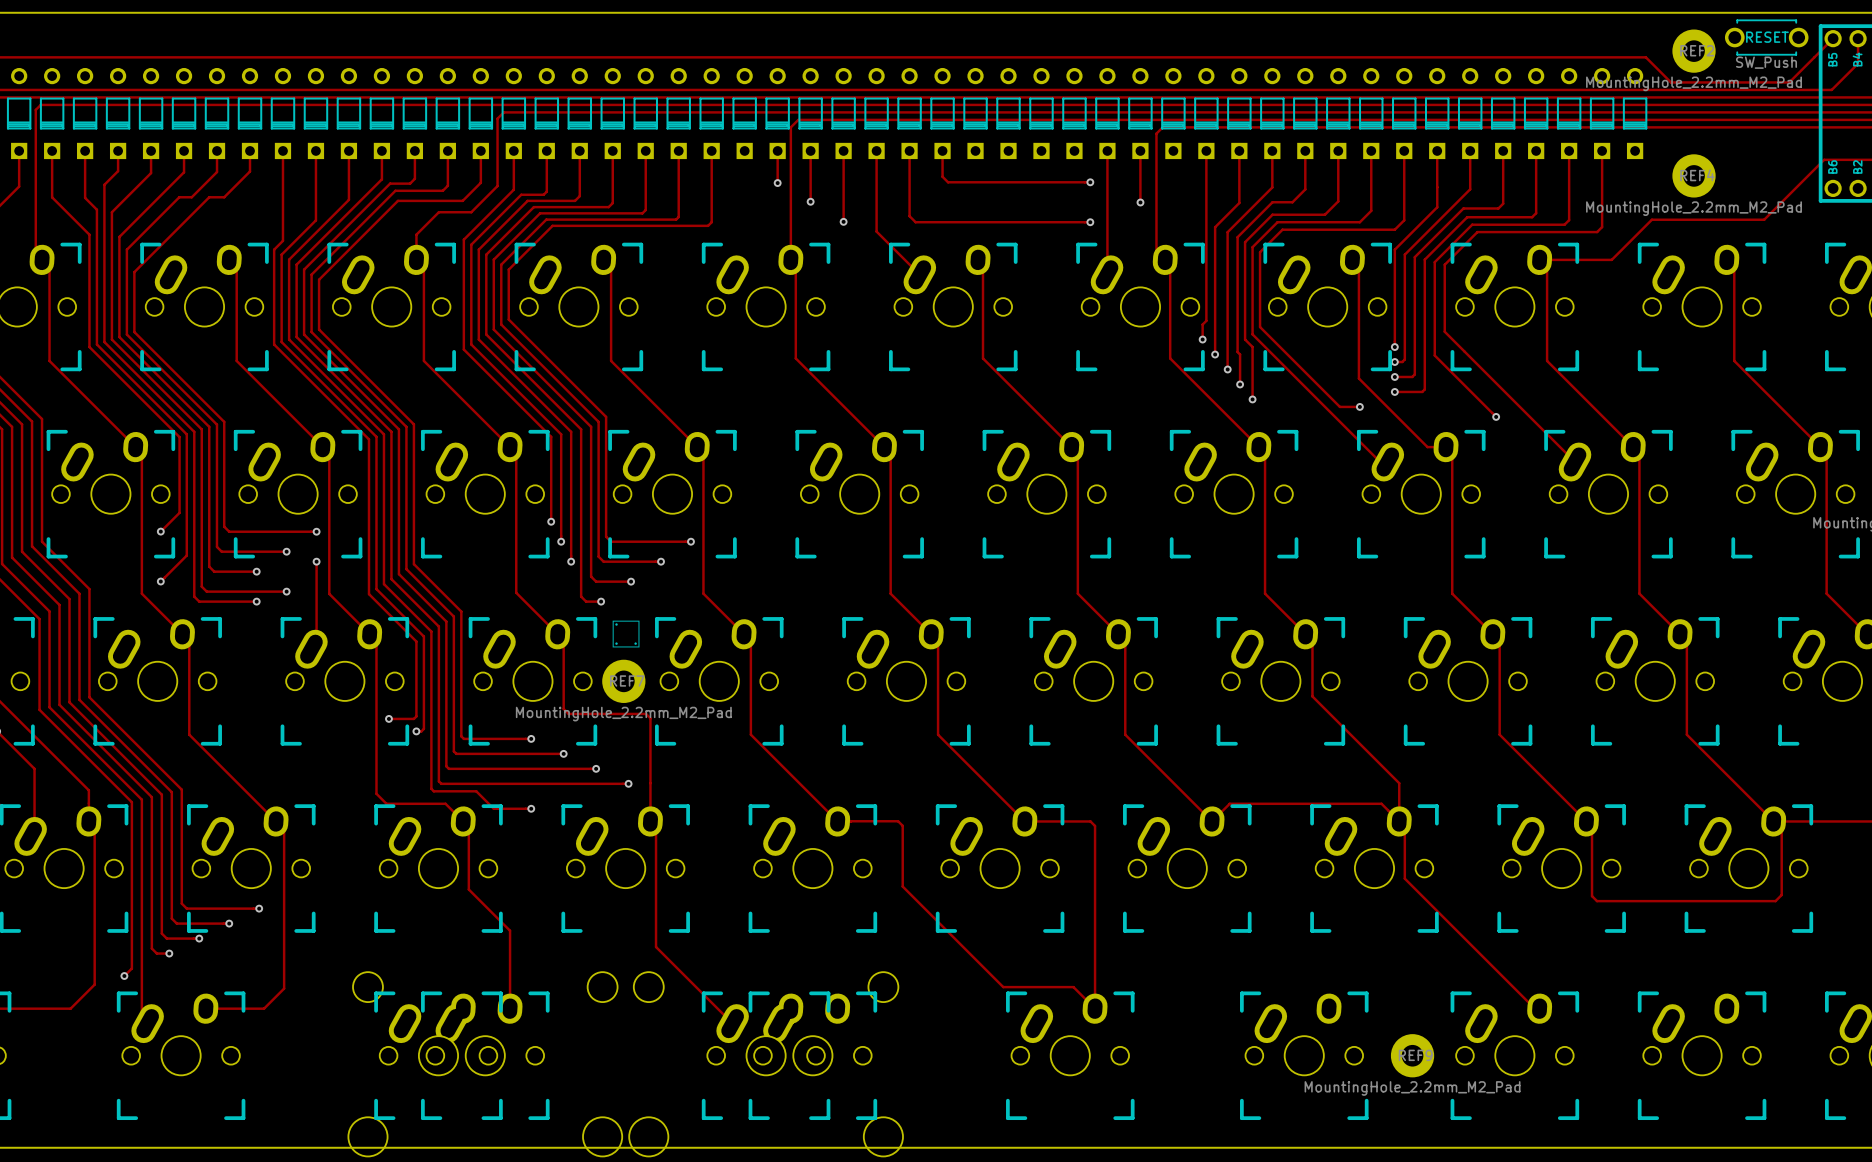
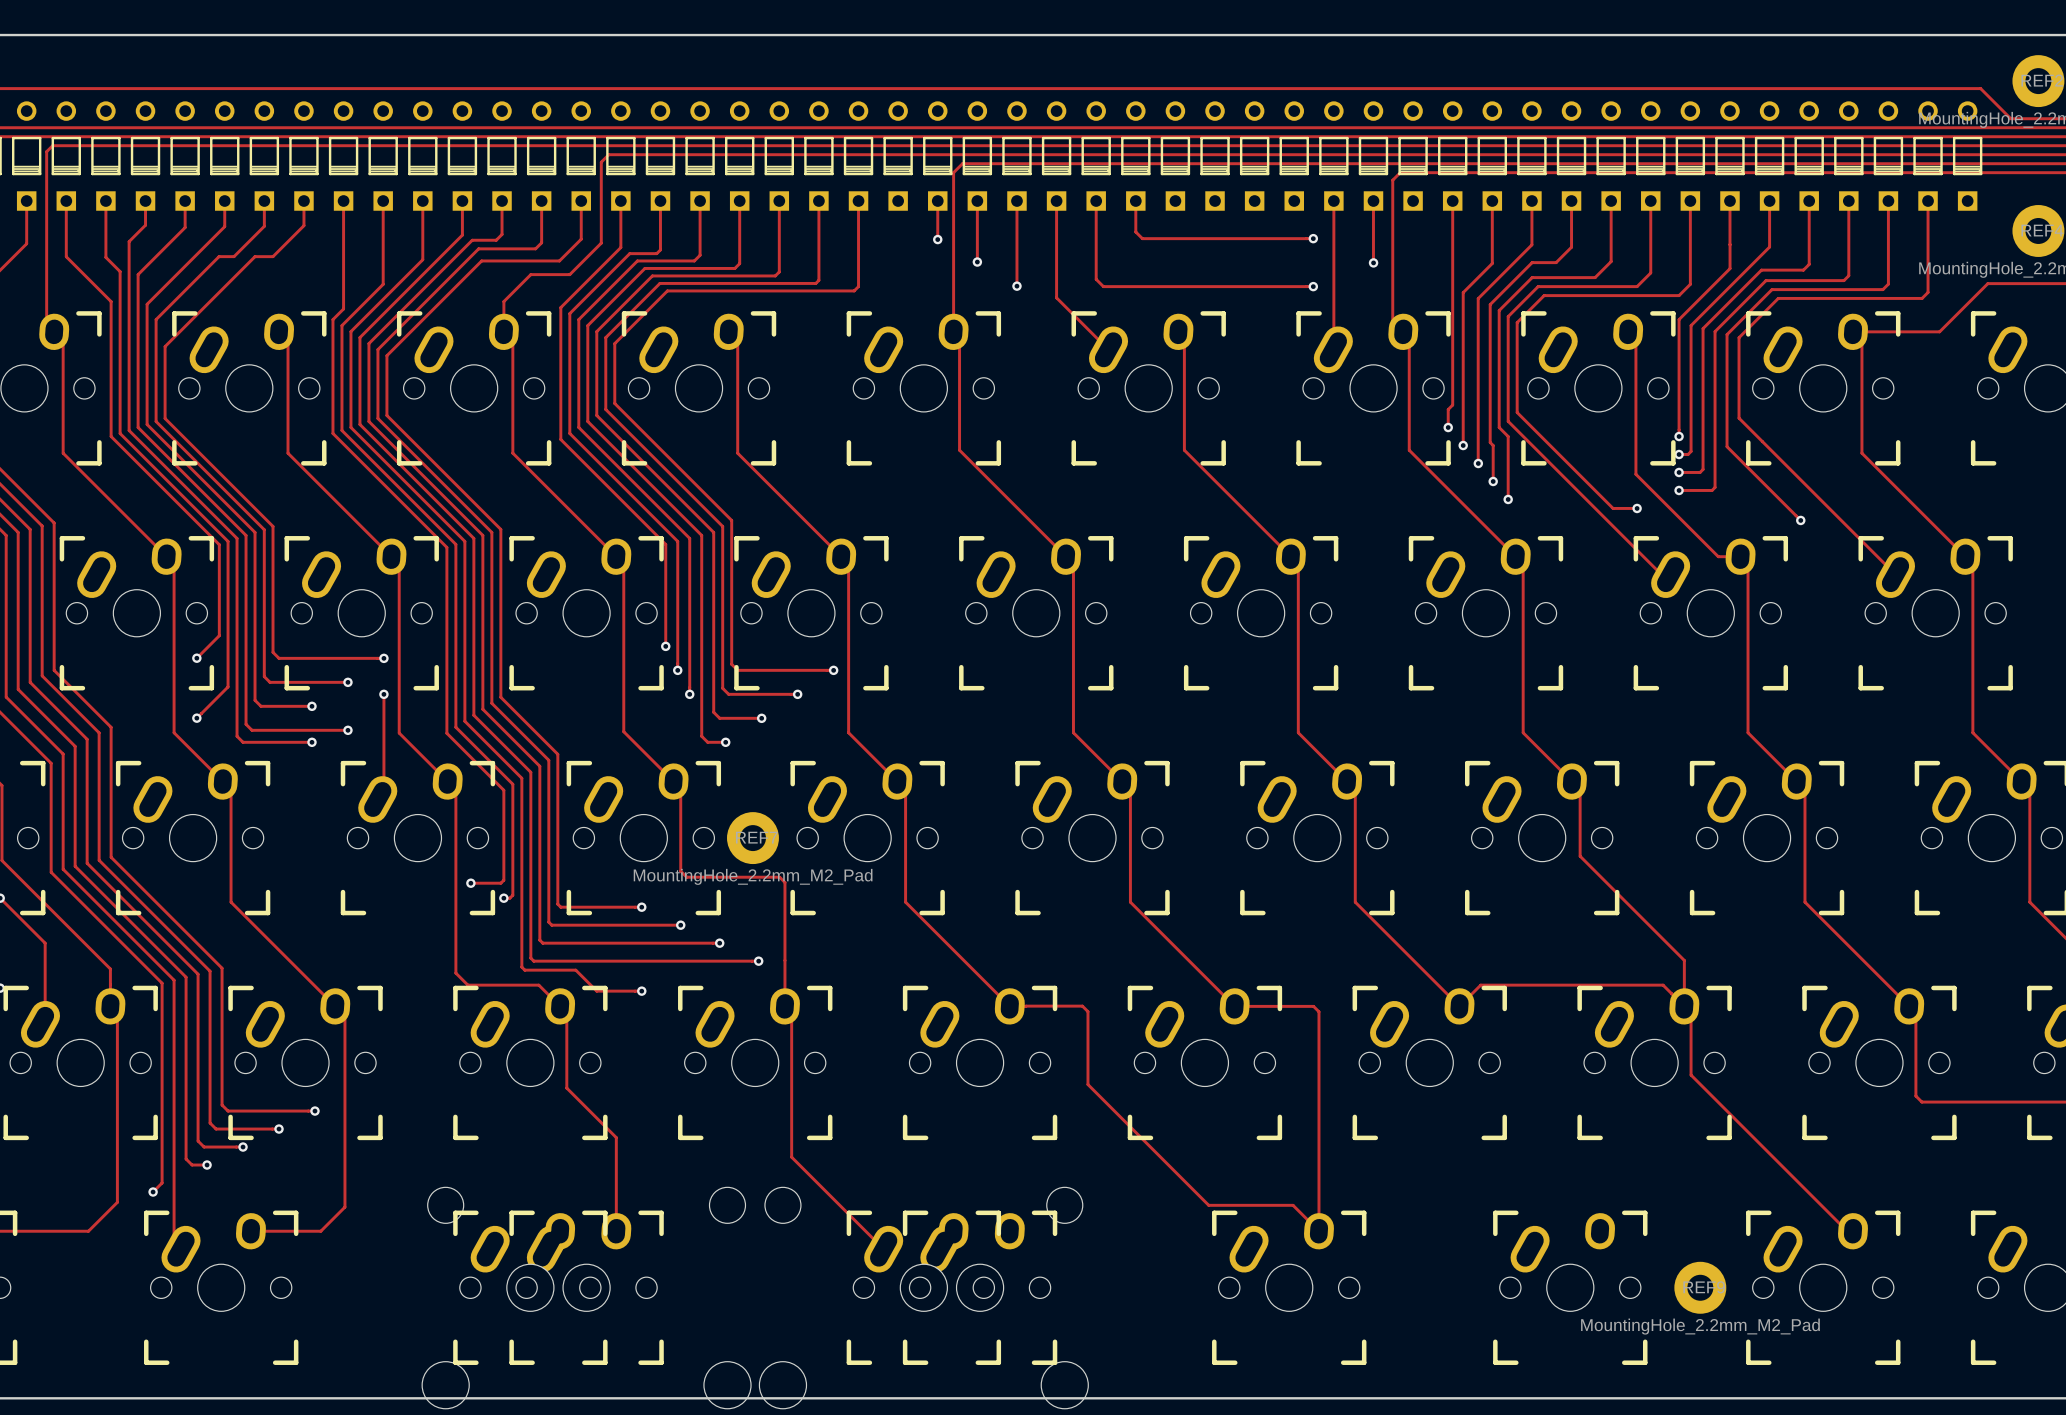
drawing: [612, 620, 640, 648] -> none

